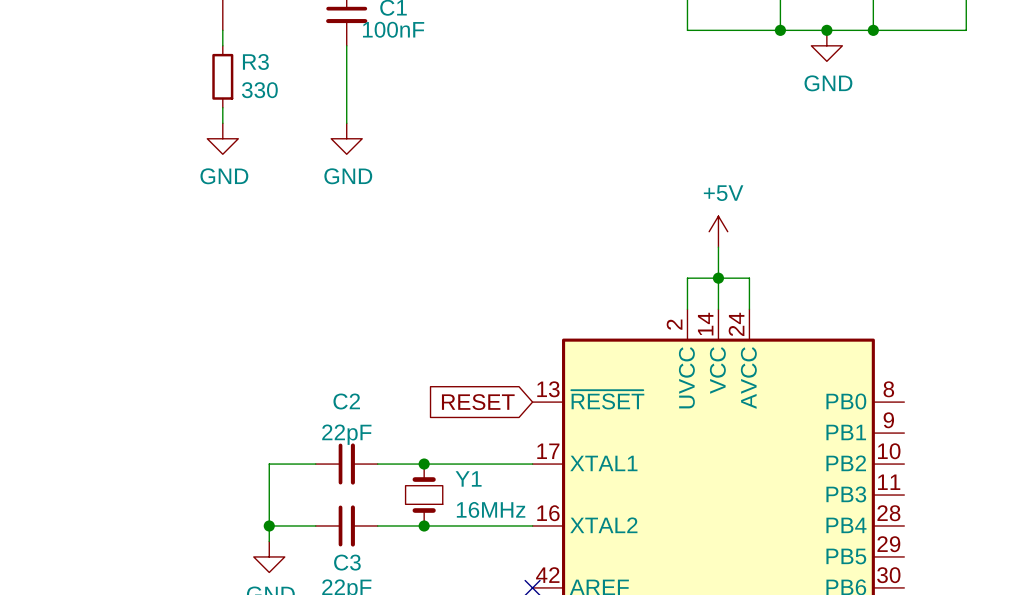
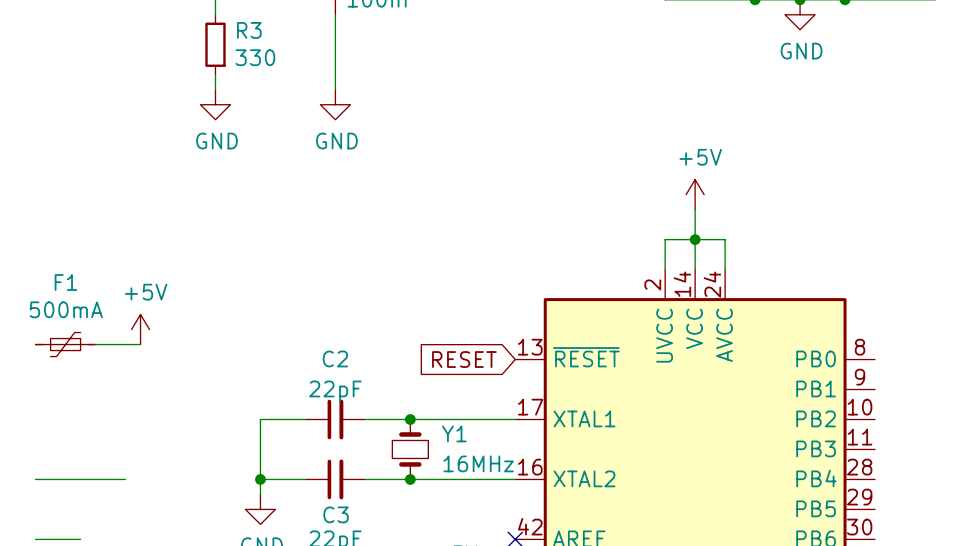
power symbol: none -> +5V (140, 329)
F1: none -> 500mA (65, 344)
wire: none -> (95, 344) (140, 344)
wire: none -> (35, 479) (125, 479)
wire: none -> (35, 539) (80, 539)

